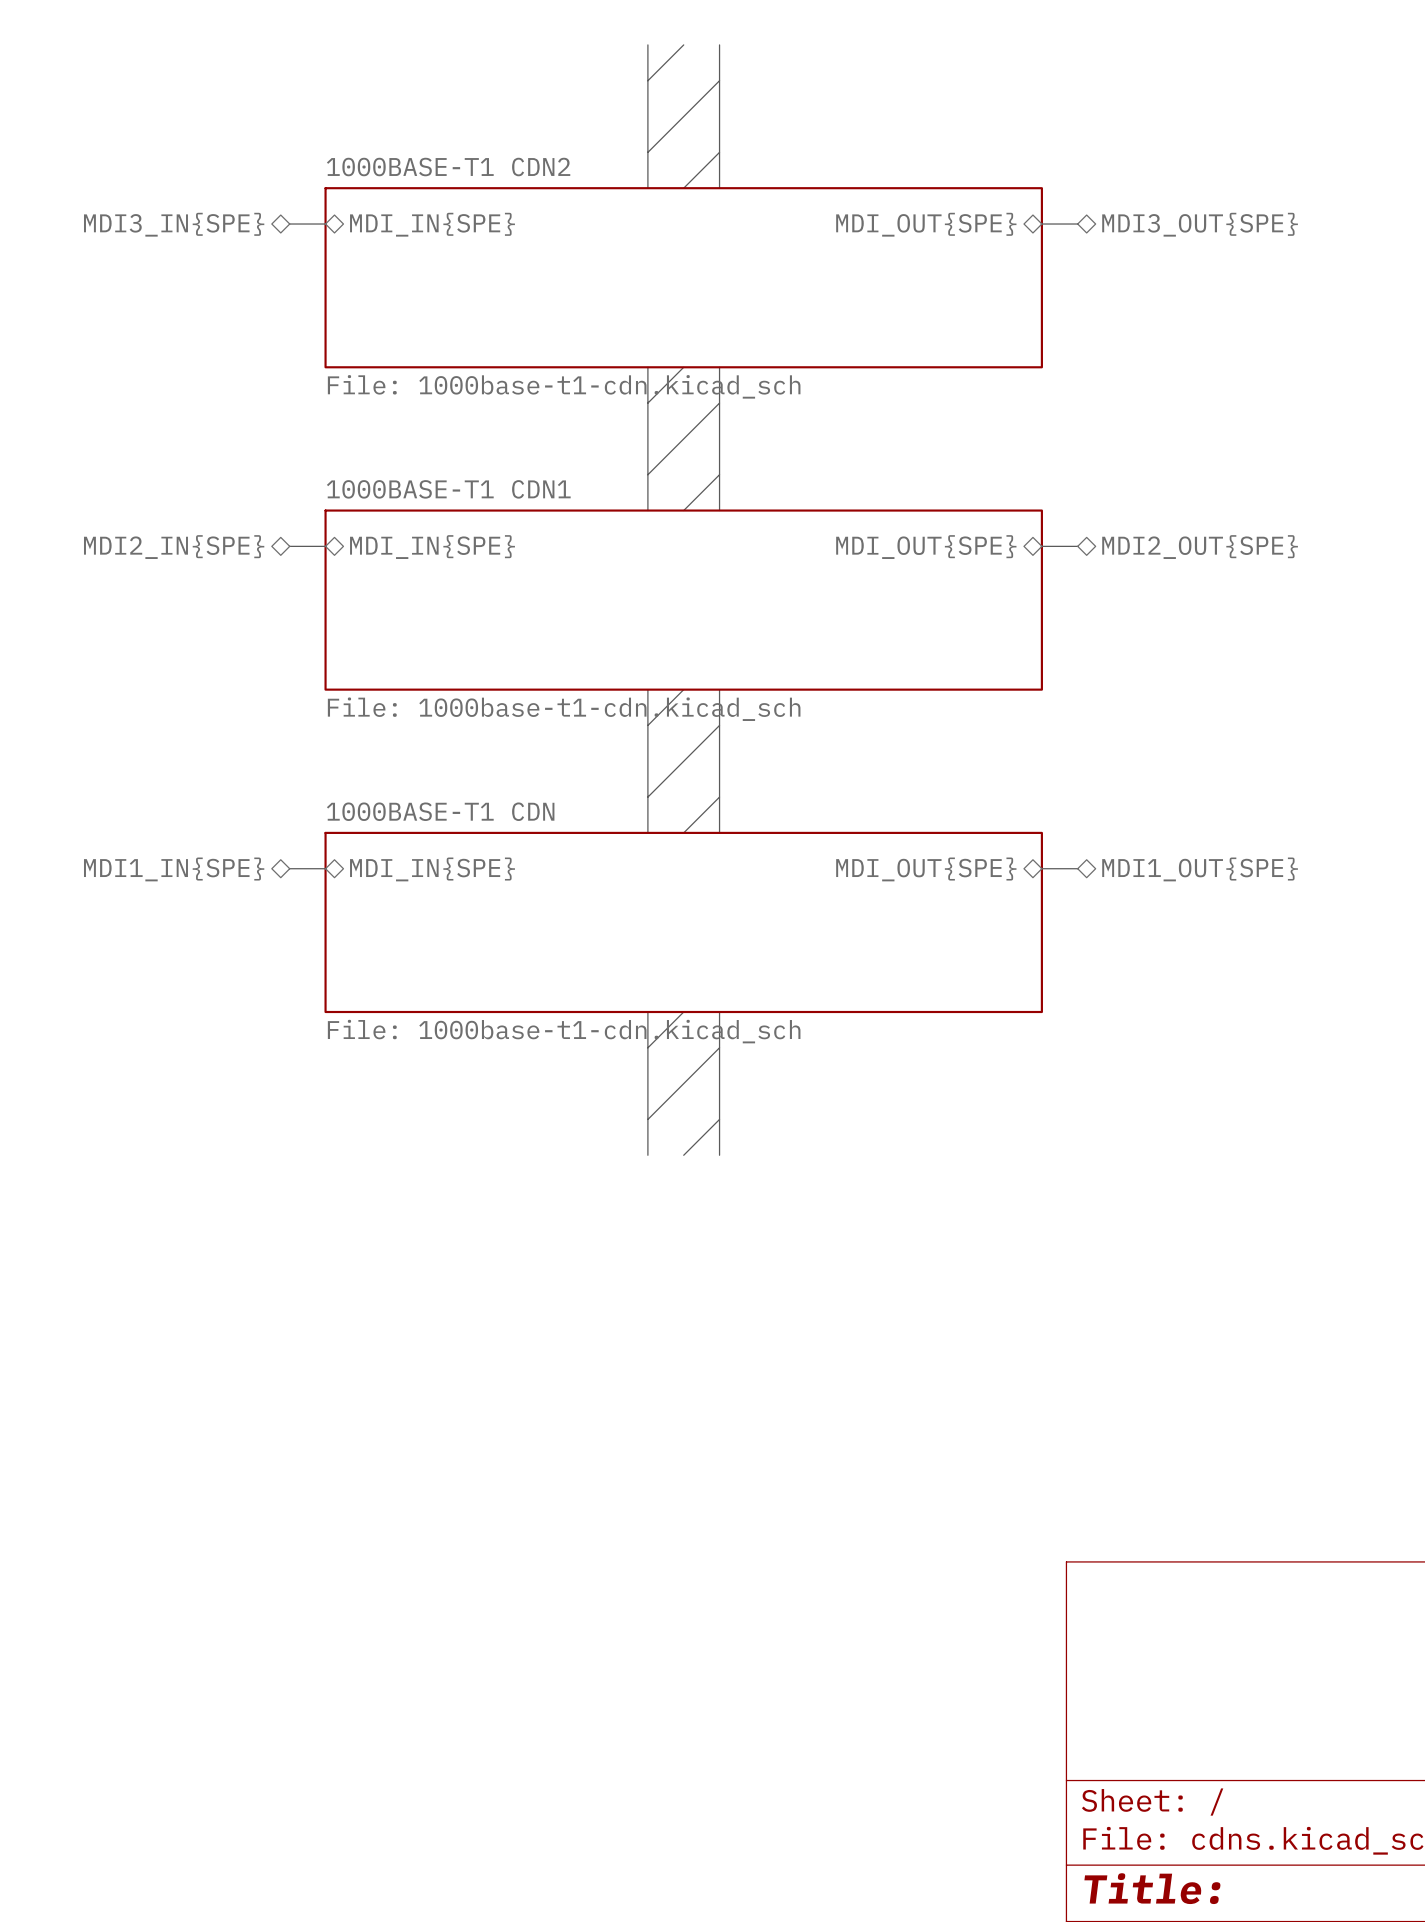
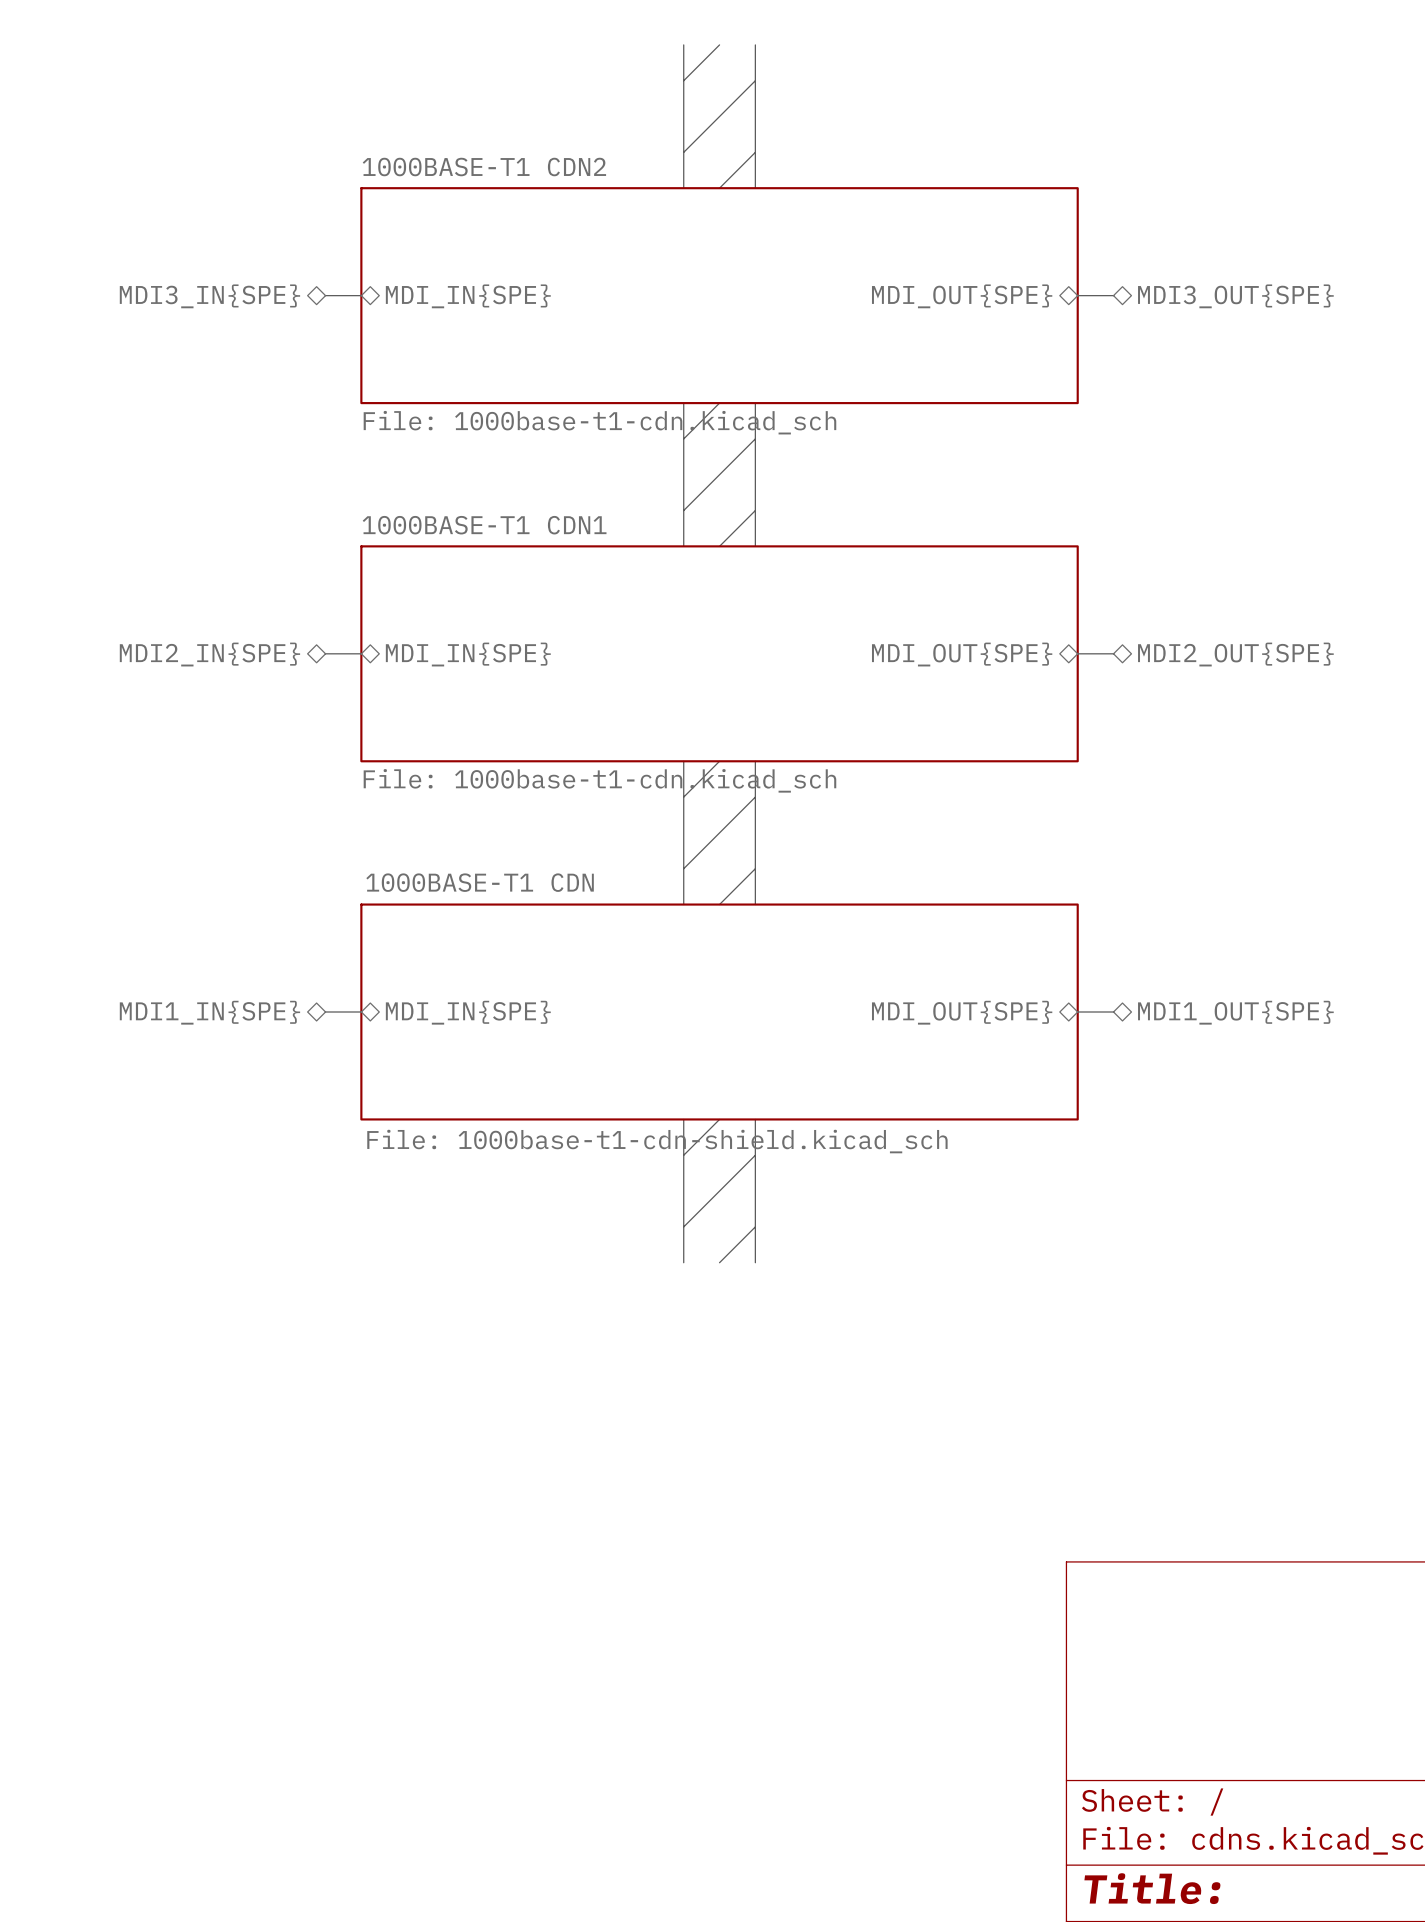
line: (647, 44) (647, 188) -> none
line: (683, 44) (647, 80) -> (755, 152) (719, 188)
line: (719, 44) (719, 188) -> (719, 44) (683, 80)
line: (719, 80) (647, 152) -> (755, 80) (683, 152)
line: (719, 152) (683, 188) -> (683, 44) (683, 188)
sheet 1000BASE-T1 CDN2 shape: [324, 187, 1043, 369] -> [360, 187, 1079, 405]
hierarchical label position: MDI3_IN{SPE} (174, 224) -> MDI3_IN{SPE} (209, 296)
bus: (289, 224) (325, 224) -> (325, 295) (361, 295)
sheet pin position: MDI_IN{SPE} (432, 224) -> MDI_IN{SPE} (468, 296)
sheet pin position: MDI_OUT{SPE} (926, 224) -> MDI_OUT{SPE} (962, 296)
bus: (1041, 224) (1077, 224) -> (1077, 295) (1113, 295)
hierarchical label position: MDI3_OUT{SPE} (1200, 224) -> MDI3_OUT{SPE} (1235, 296)
line: (647, 367) (647, 510) -> (683, 403) (683, 546)
line: (683, 367) (647, 403) -> (755, 438) (719, 474)
line: (719, 367) (719, 510) -> (755, 44) (755, 188)
line: none -> (755, 403) (755, 546)
line: (683, 438) (647, 474) -> (755, 510) (719, 546)
sheet 1000BASE-T1 CDN1 shape: [324, 509, 1043, 691] -> [360, 545, 1079, 763]
bus: (289, 546) (325, 546) -> (325, 653) (361, 653)
bus: (1041, 546) (1077, 546) -> (1077, 653) (1113, 653)
hierarchical label position: MDI2_IN{SPE} (174, 547) -> MDI2_IN{SPE} (209, 654)
sheet pin: MDI_IN{SPE} (432, 547) -> none
sheet pin: MDI_OUT{SPE} (926, 547) -> none
hierarchical label position: MDI2_OUT{SPE} (1200, 547) -> MDI2_OUT{SPE} (1235, 654)
sheet pin: none -> MDI_IN{SPE} (468, 654)
sheet pin: none -> MDI_OUT{SPE} (962, 654)
line: (647, 689) (647, 832) -> (683, 761) (683, 904)
line: (683, 689) (647, 725) -> (719, 761) (683, 797)
line: (719, 689) (719, 832) -> (755, 761) (755, 904)
line: (719, 725) (647, 797) -> (755, 797) (683, 868)
line: (719, 797) (683, 832) -> (755, 868) (719, 904)
sheet 1000BASE-T1 CDN shape: [324, 831, 1043, 1014] -> [360, 903, 1079, 1121]
bus: (289, 868) (325, 868) -> (325, 1012) (361, 1012)
bus: (1041, 868) (1077, 868) -> (1077, 1012) (1113, 1012)
hierarchical label position: MDI1_IN{SPE} (174, 869) -> MDI1_IN{SPE} (209, 1012)
sheet pin: MDI_IN{SPE} (432, 869) -> none
sheet pin: MDI_OUT{SPE} (926, 869) -> none
hierarchical label position: MDI1_OUT{SPE} (1200, 869) -> MDI1_OUT{SPE} (1235, 1012)
sheet pin: none -> MDI_IN{SPE} (468, 1012)
line: (647, 1012) (647, 1155) -> (683, 1119) (683, 1262)
line: (683, 1012) (647, 1047) -> (755, 1226) (719, 1262)
line: (719, 1012) (719, 1155) -> (755, 1119) (755, 1262)
sheet pin: none -> MDI_OUT{SPE} (962, 1012)
sheet 1000BASE-T1 CDN value: File: 1000base-t1-cdn.kicad_sch (564, 1031) -> File: 1000base-t1-cdn-shield.kicad_sch (657, 1141)
line: (719, 1047) (647, 1119) -> (755, 1155) (683, 1226)

